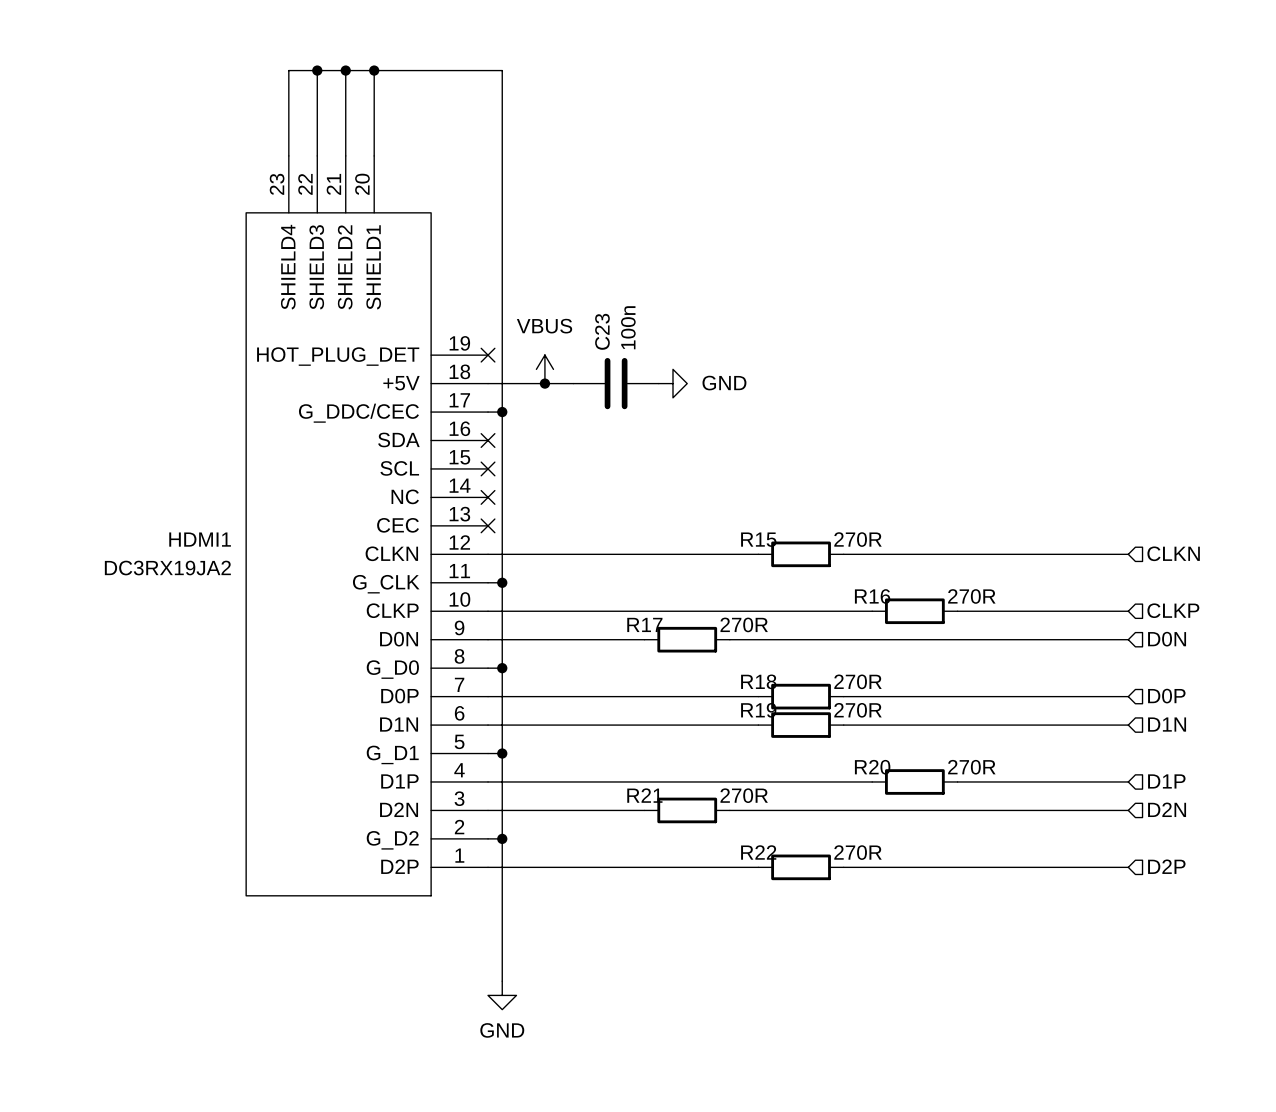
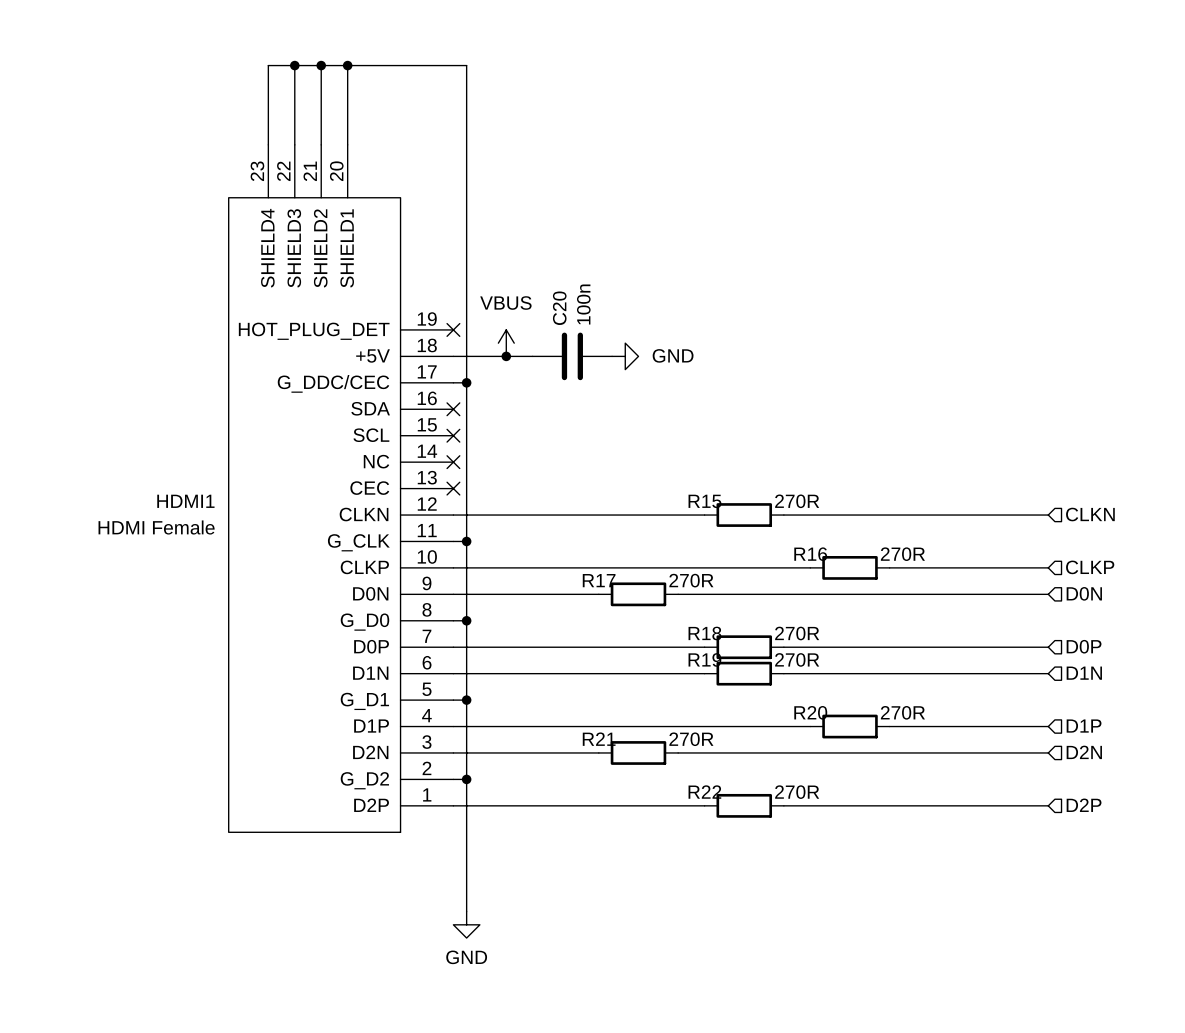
C23 name: C23 (602, 331) -> C20 (559, 308)
HDMI1 value: DC3RX19JA2 (167, 568) -> HDMI Female (156, 527)

